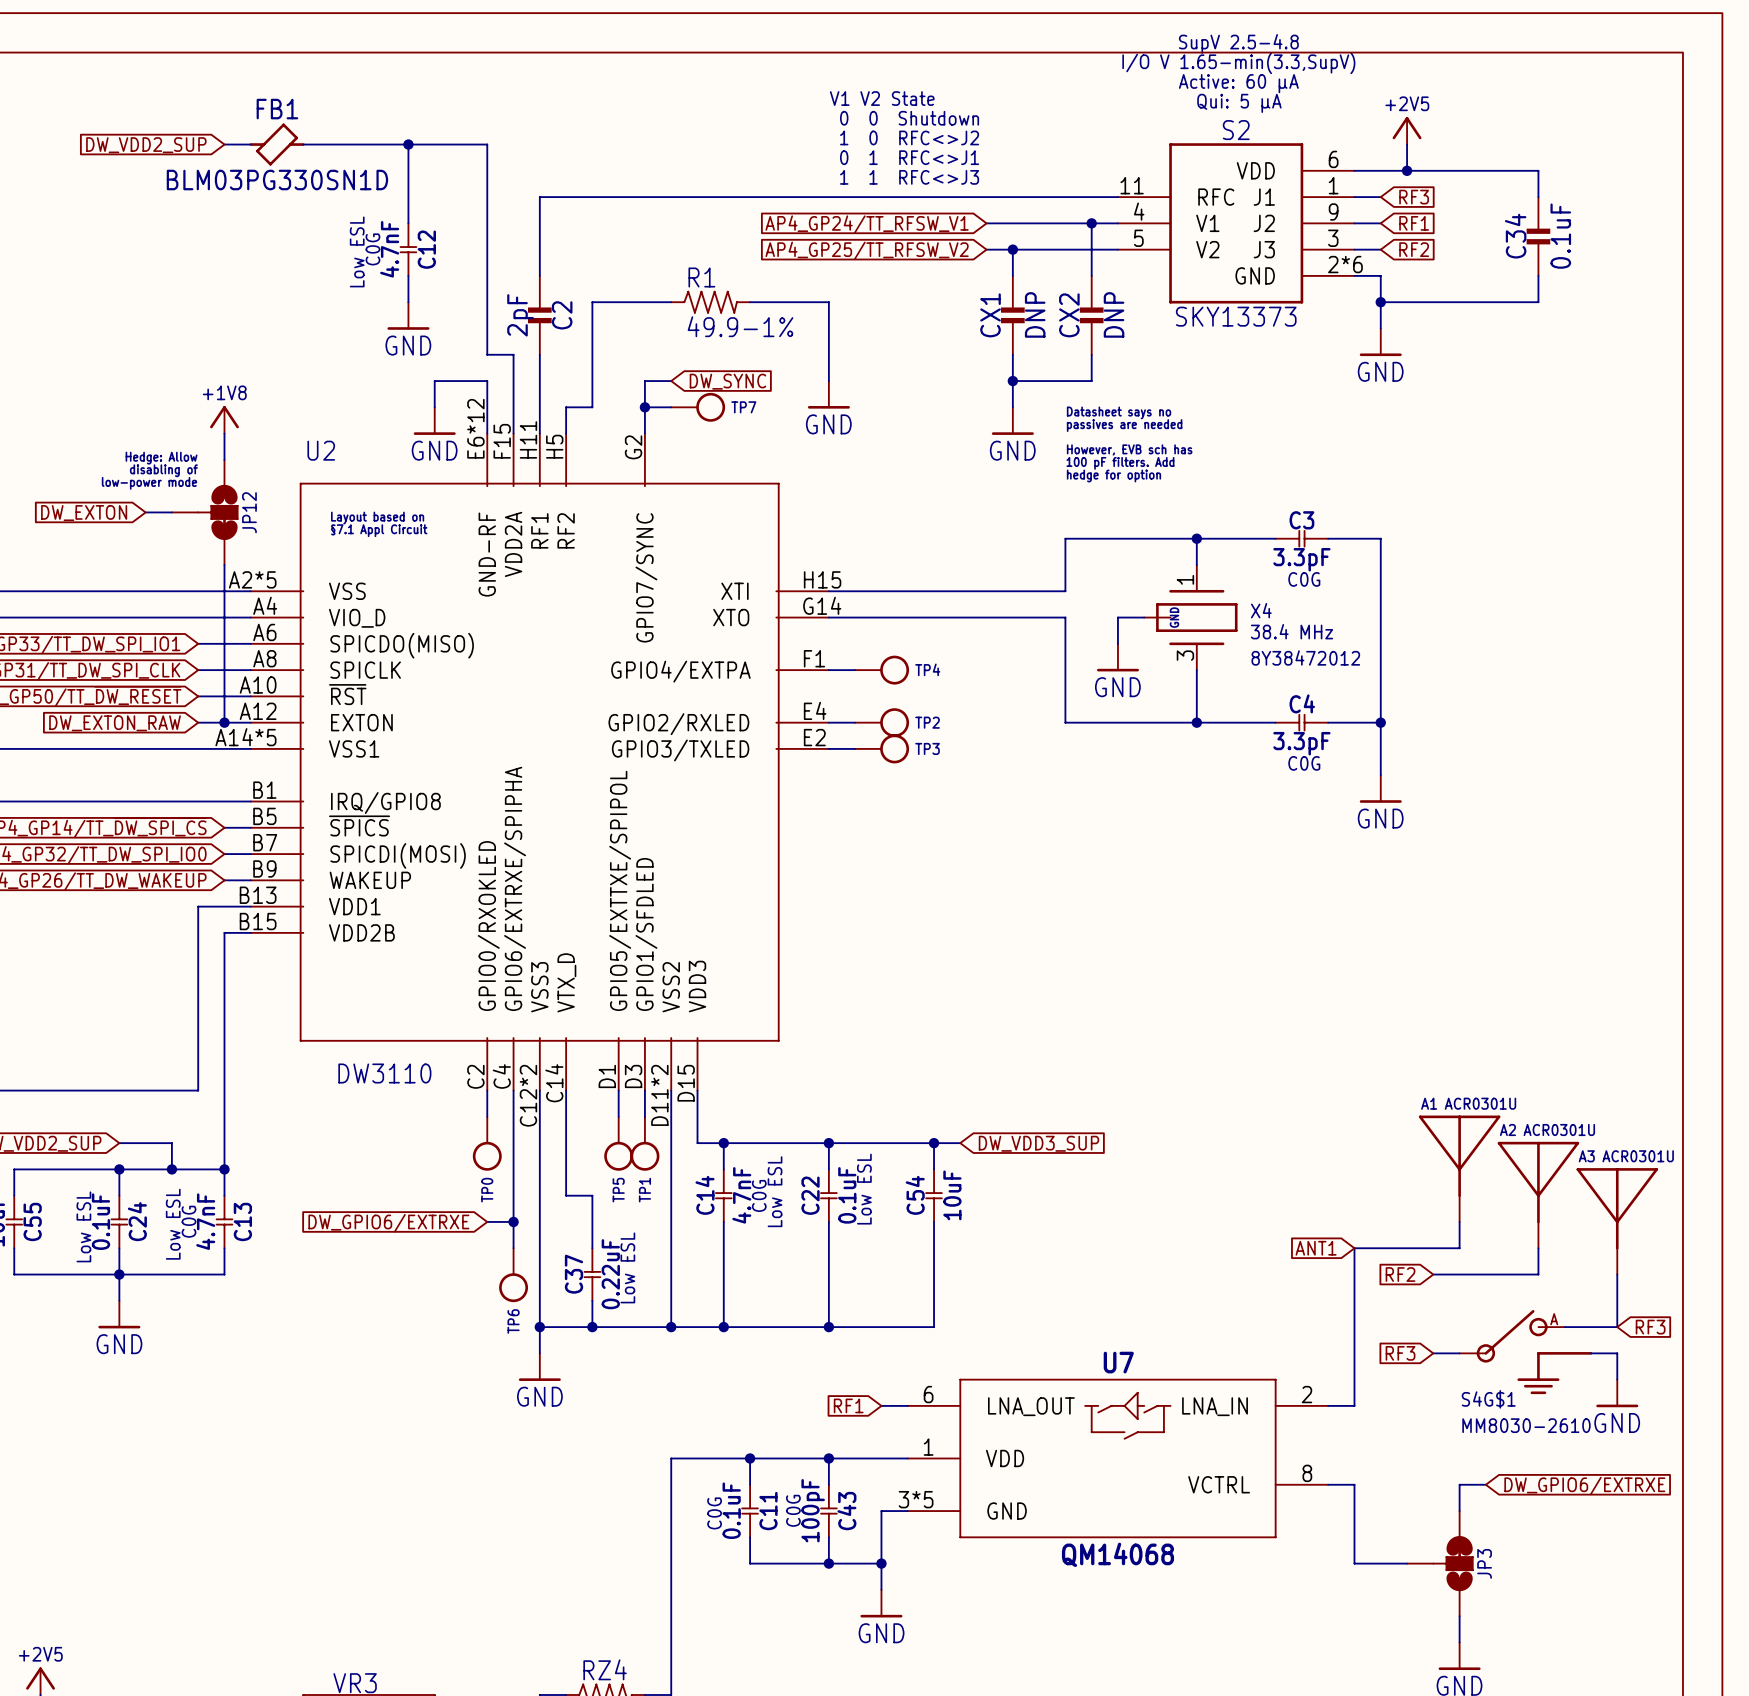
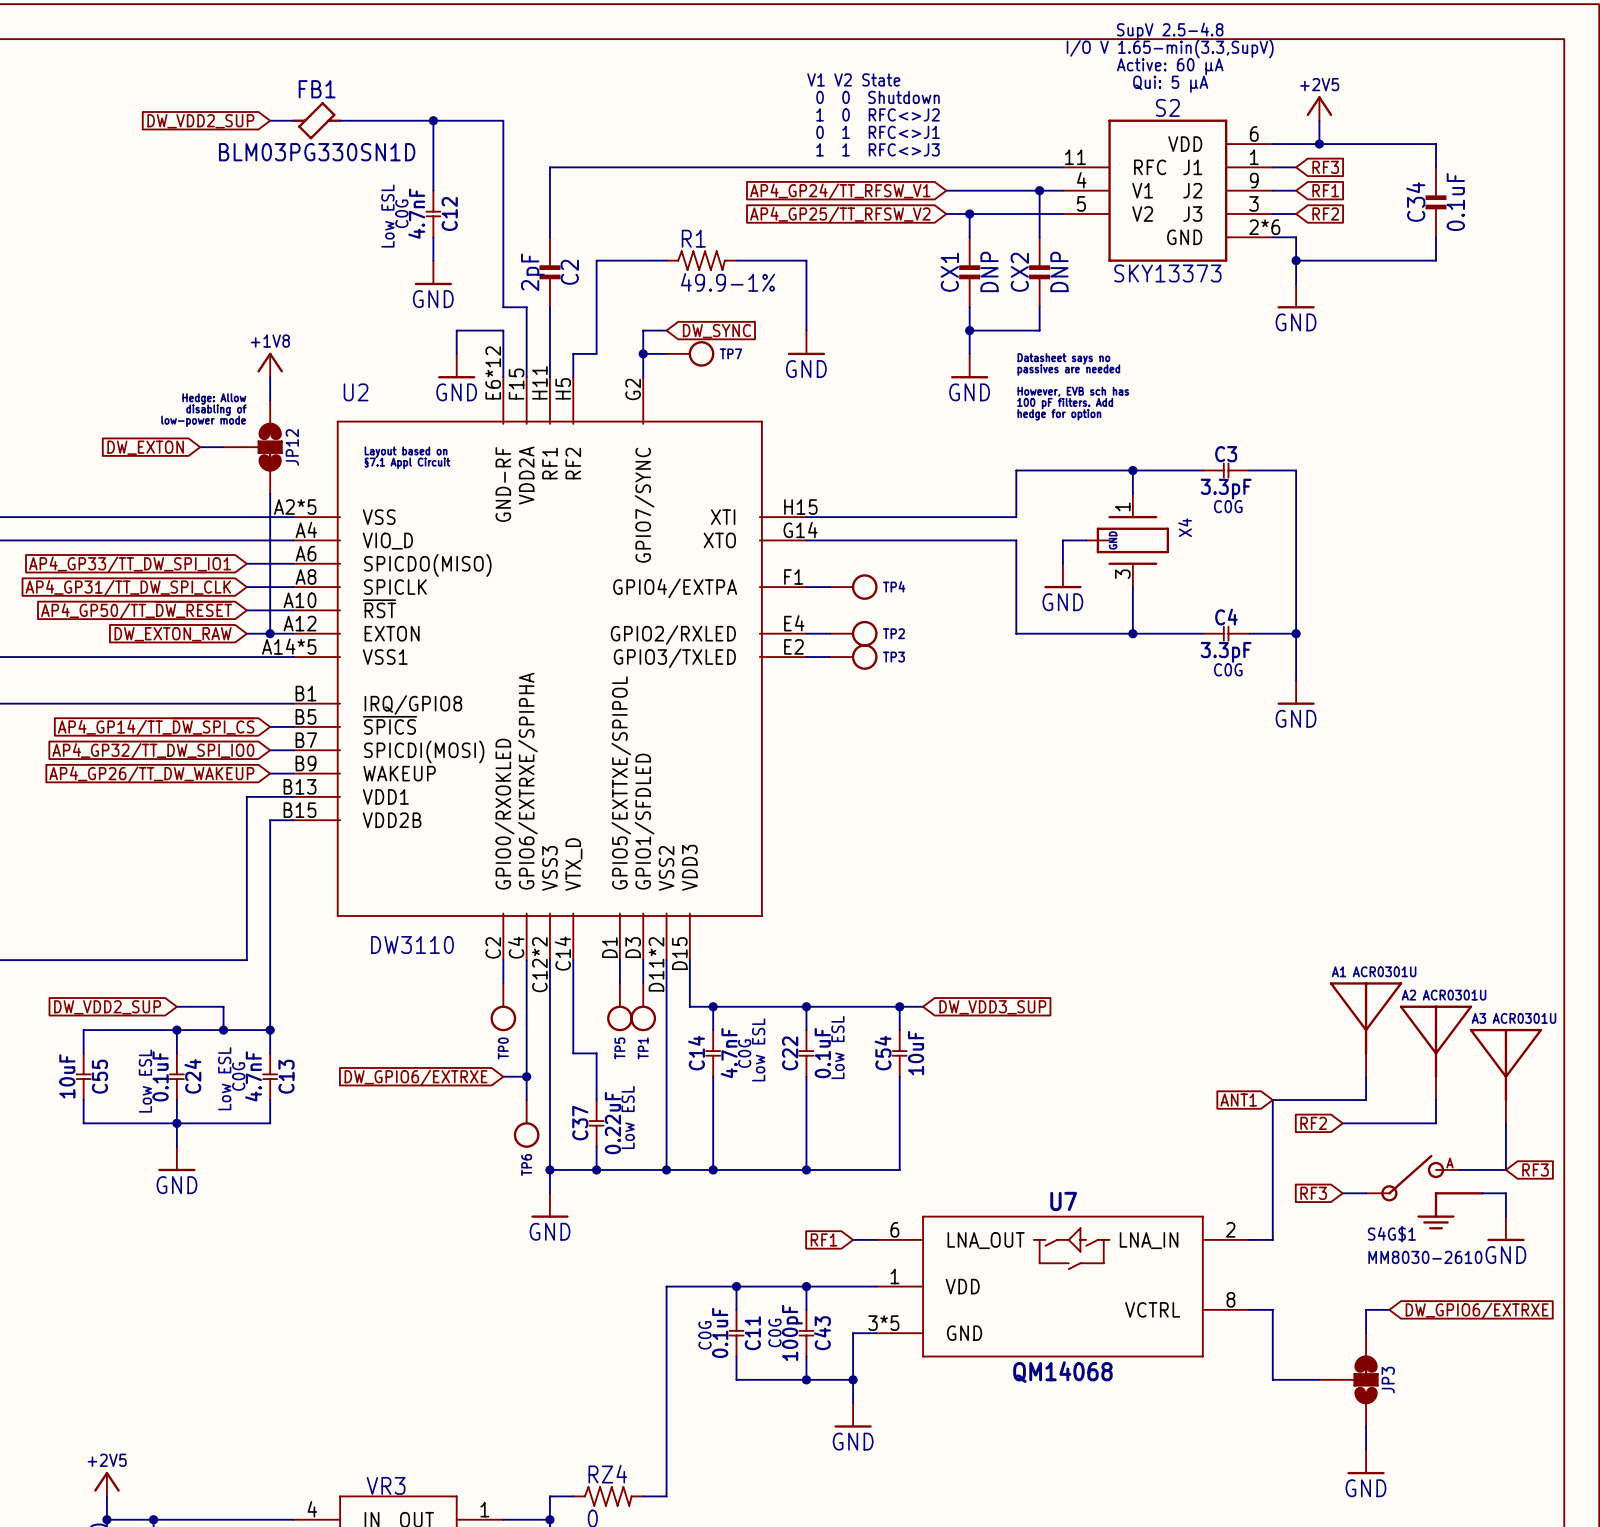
X4 name rotation: 0° (1261, 610) -> 90° counterclockwise (1185, 527)
X4 text: 38.4 MHz (1292, 631) -> none
X4 text: 8Y38472012 (1305, 657) -> none

